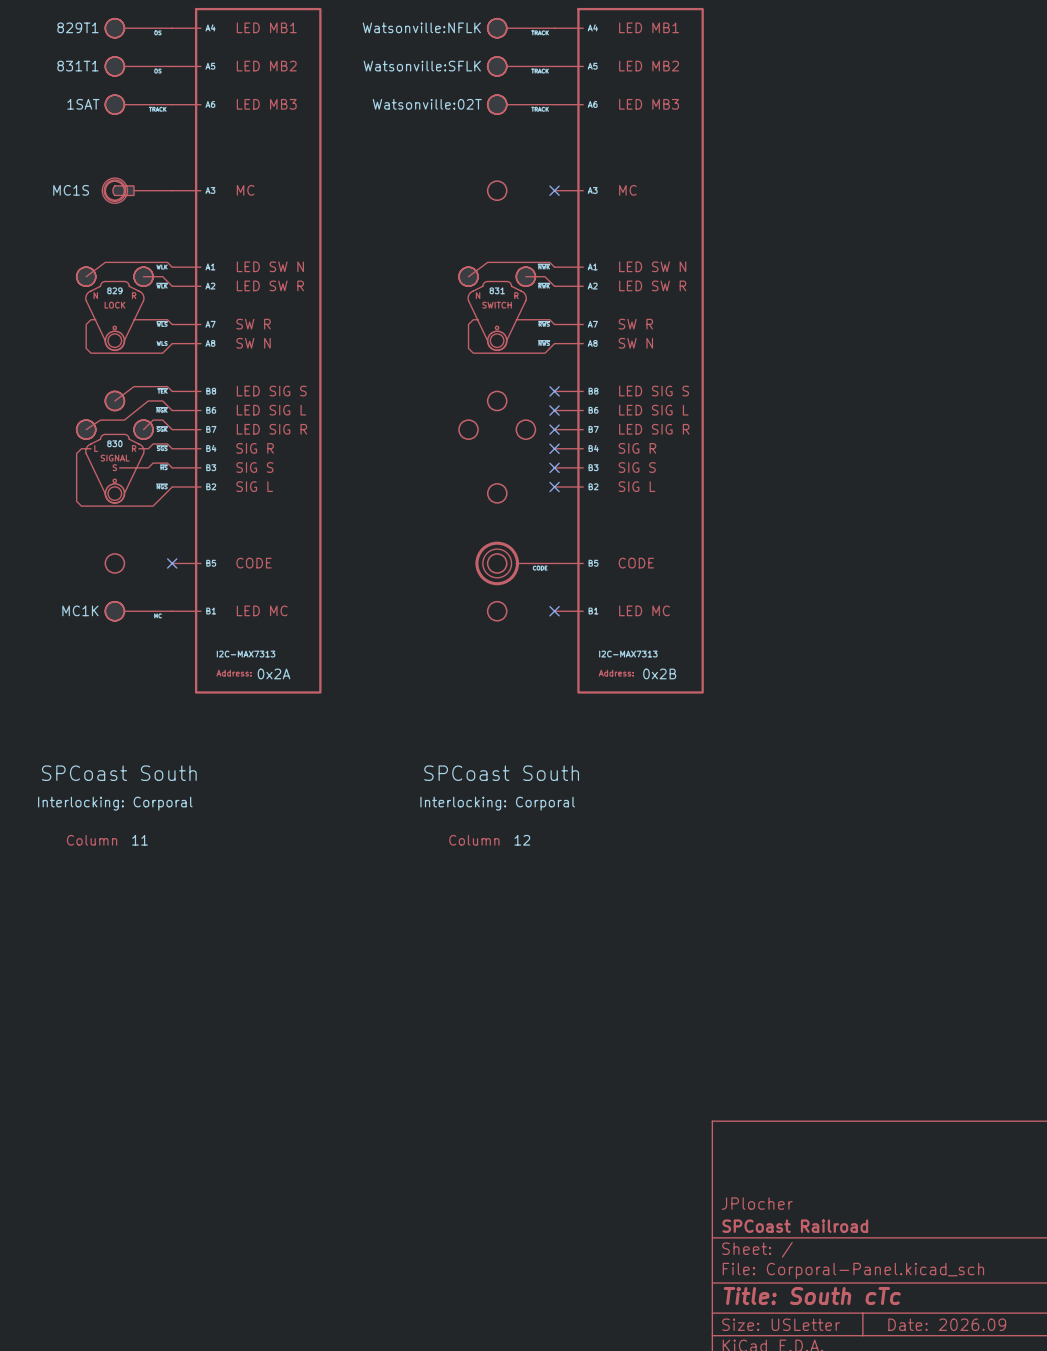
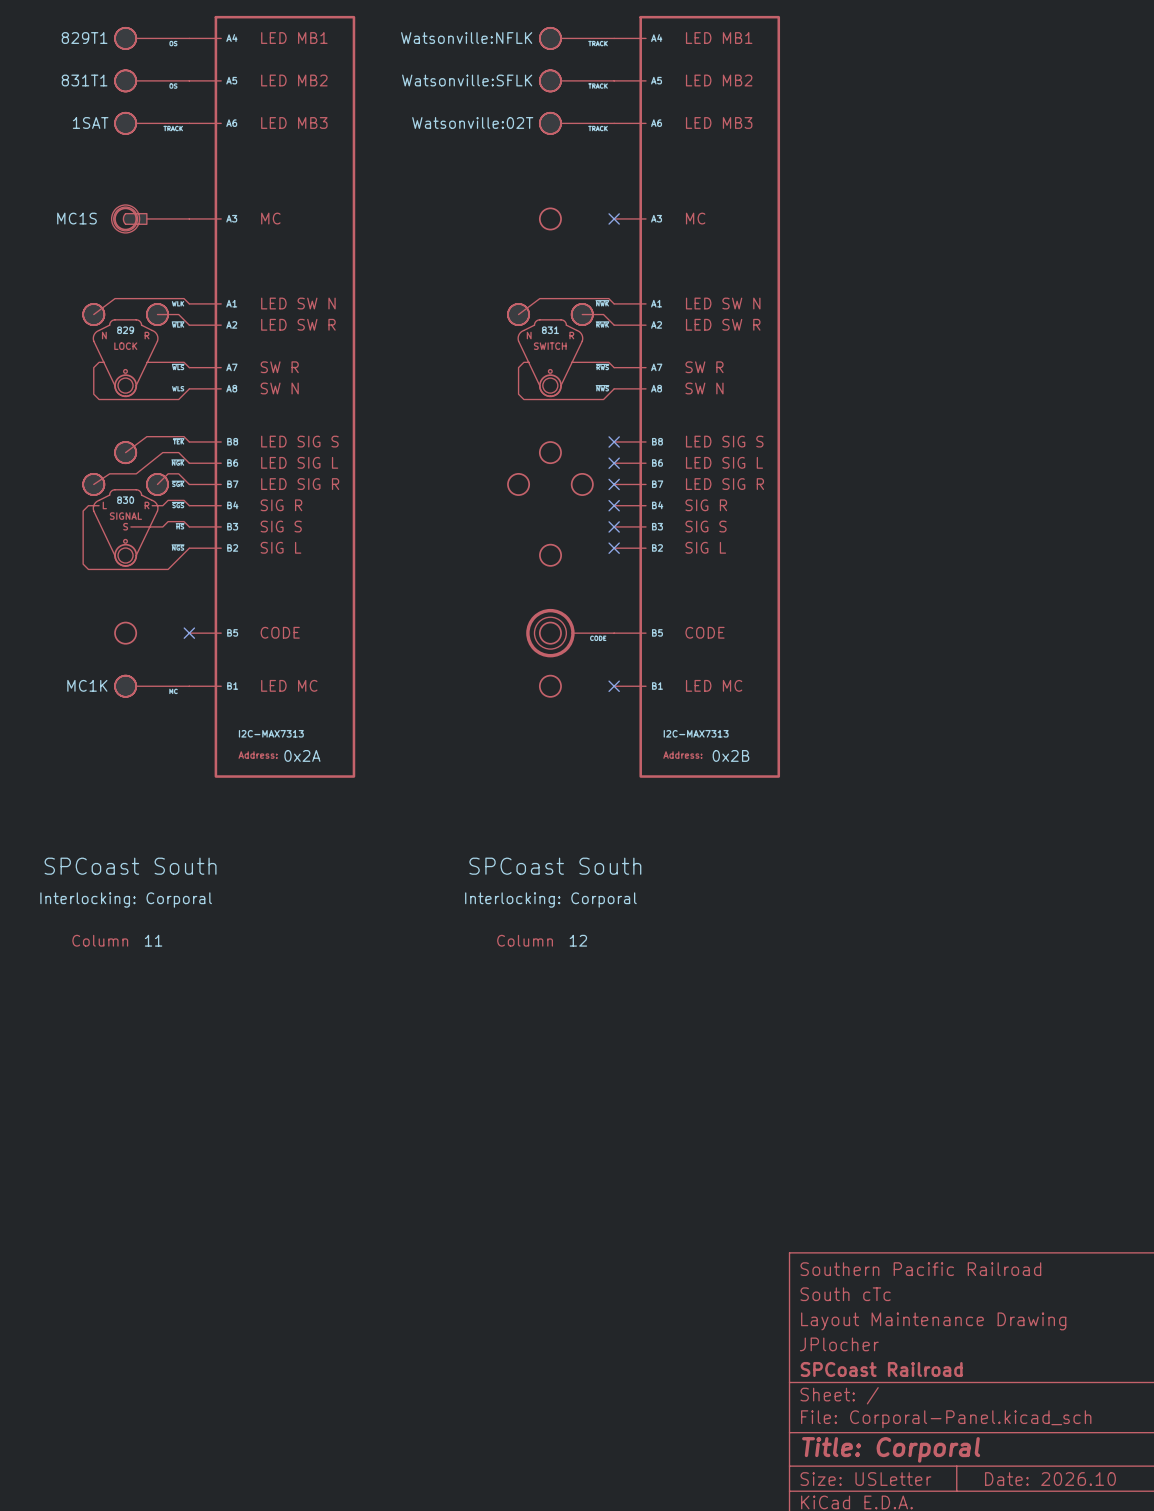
title block: none -> Southern Pacific Railroad (920, 1269)
title block: none -> South cTc (845, 1294)
title block: none -> Layout Maintenance Drawing (933, 1321)
title block: Title: South cTc (812, 1295) -> Title: Corporal (891, 1449)
title block: Date: 2026.09 (947, 1324) -> Date: 2026.10 (1050, 1479)

